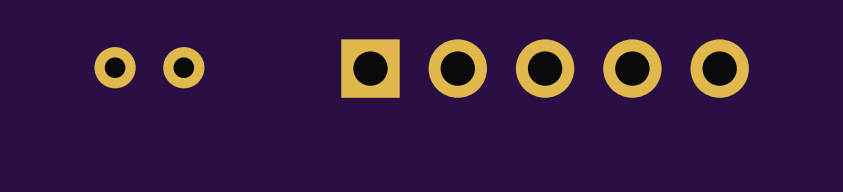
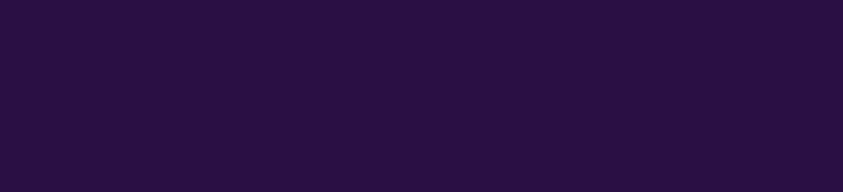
part: (149, 67) -> none
part: (545, 68) -> none

